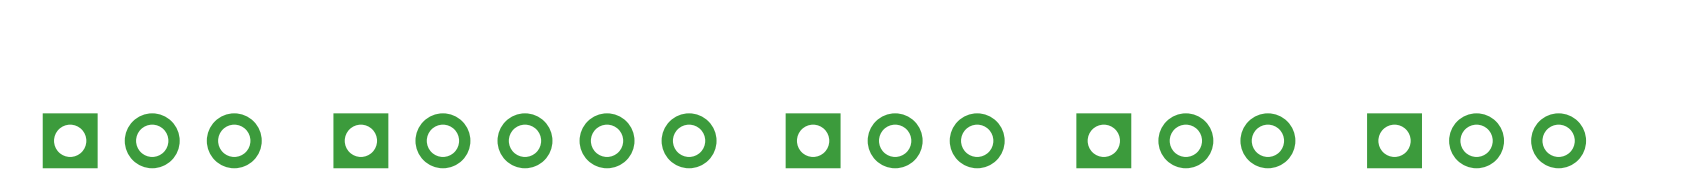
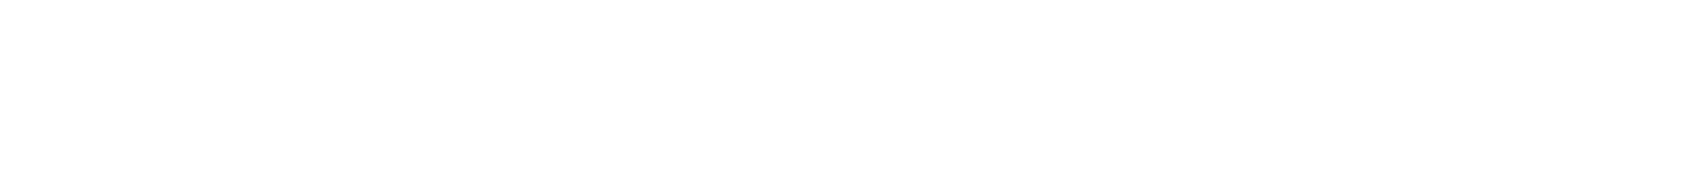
part: (152, 140) -> none
part: (524, 140) -> none
part: (895, 140) -> none
part: (1185, 140) -> none
part: (1476, 140) -> none

